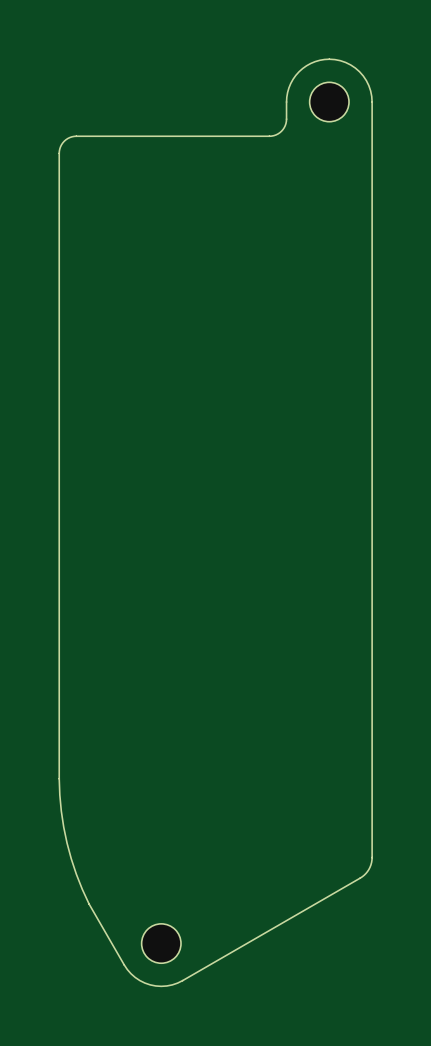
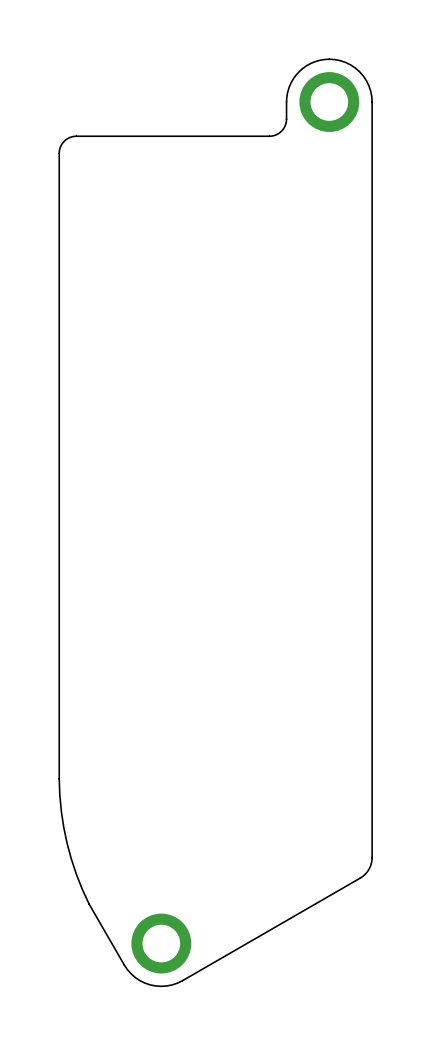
part footprint: [309, 82, 350, 122] -> [299, 72, 360, 132]
part footprint: [141, 923, 182, 964] -> [131, 913, 192, 974]

